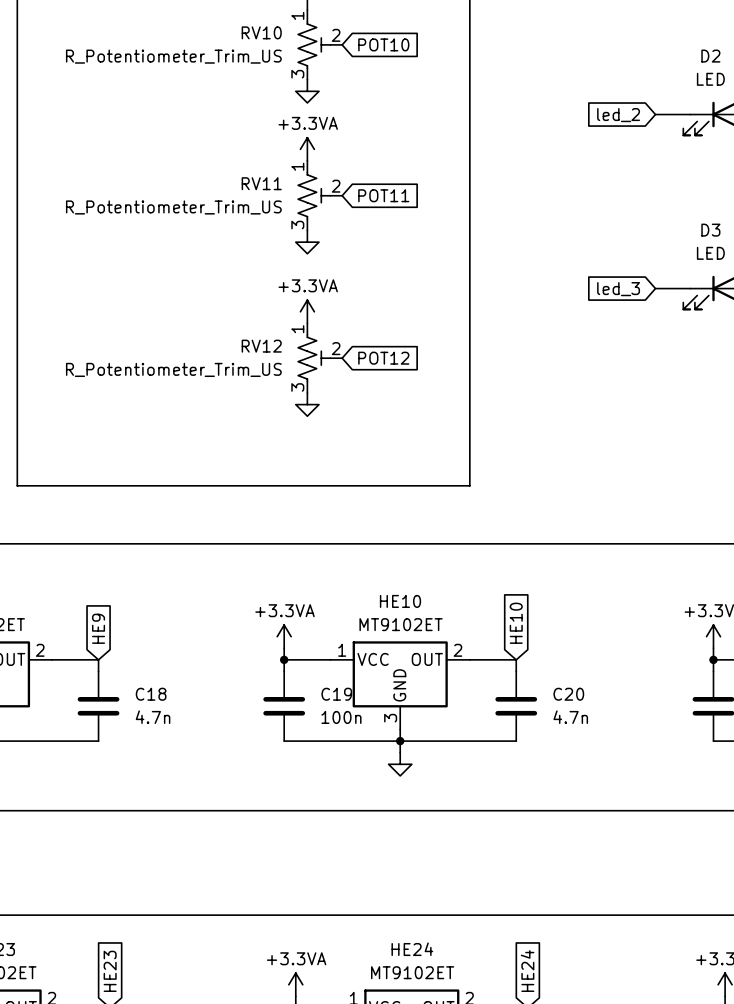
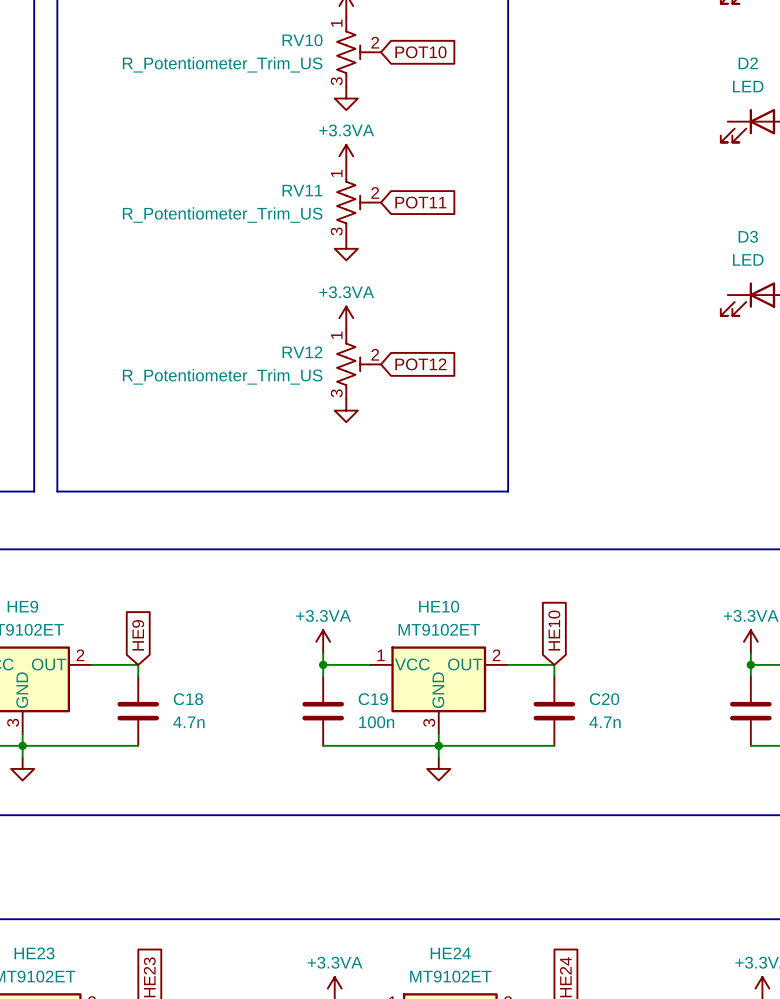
wire: (655, 114) (690, 114) -> none
global label: led_2 (618, 115) -> none
wire: (655, 288) (690, 288) -> none
global label: led_3 (618, 289) -> none

